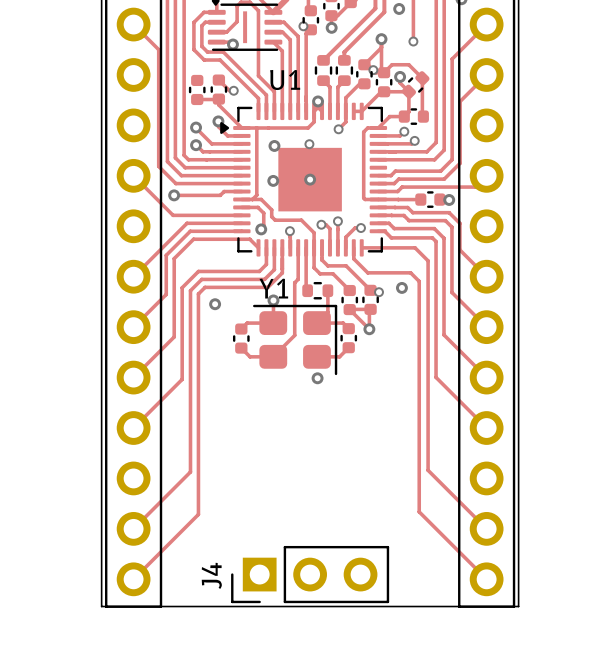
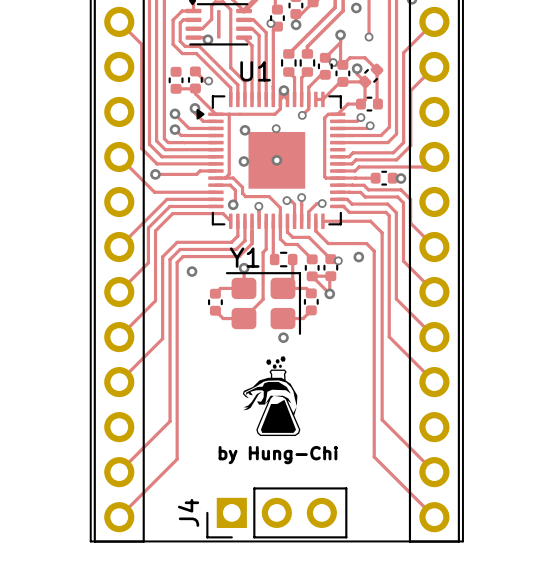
drawing: none -> [242, 356, 301, 437]
text: none -> by Hung-Chi (278, 455)

